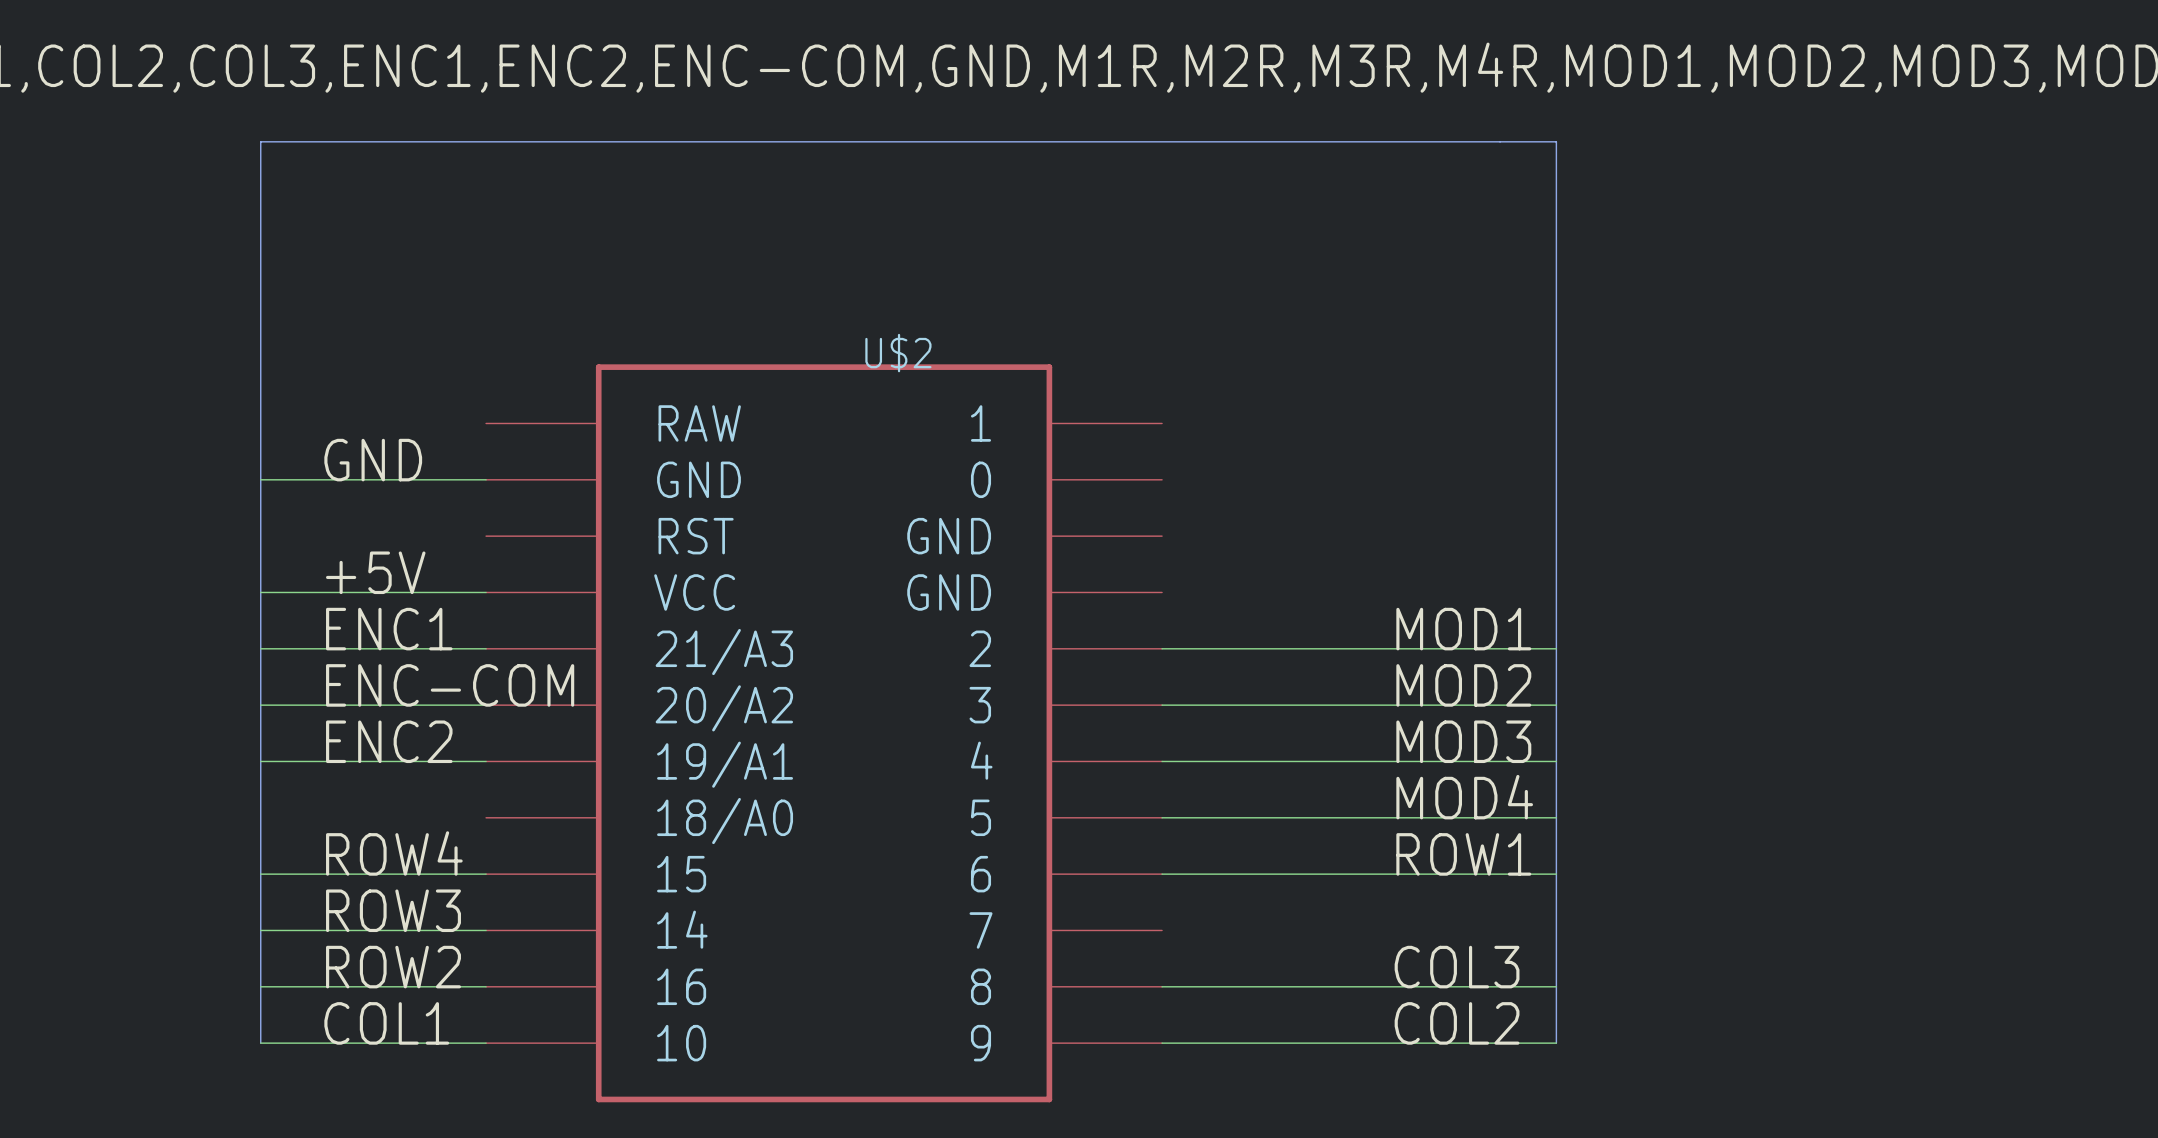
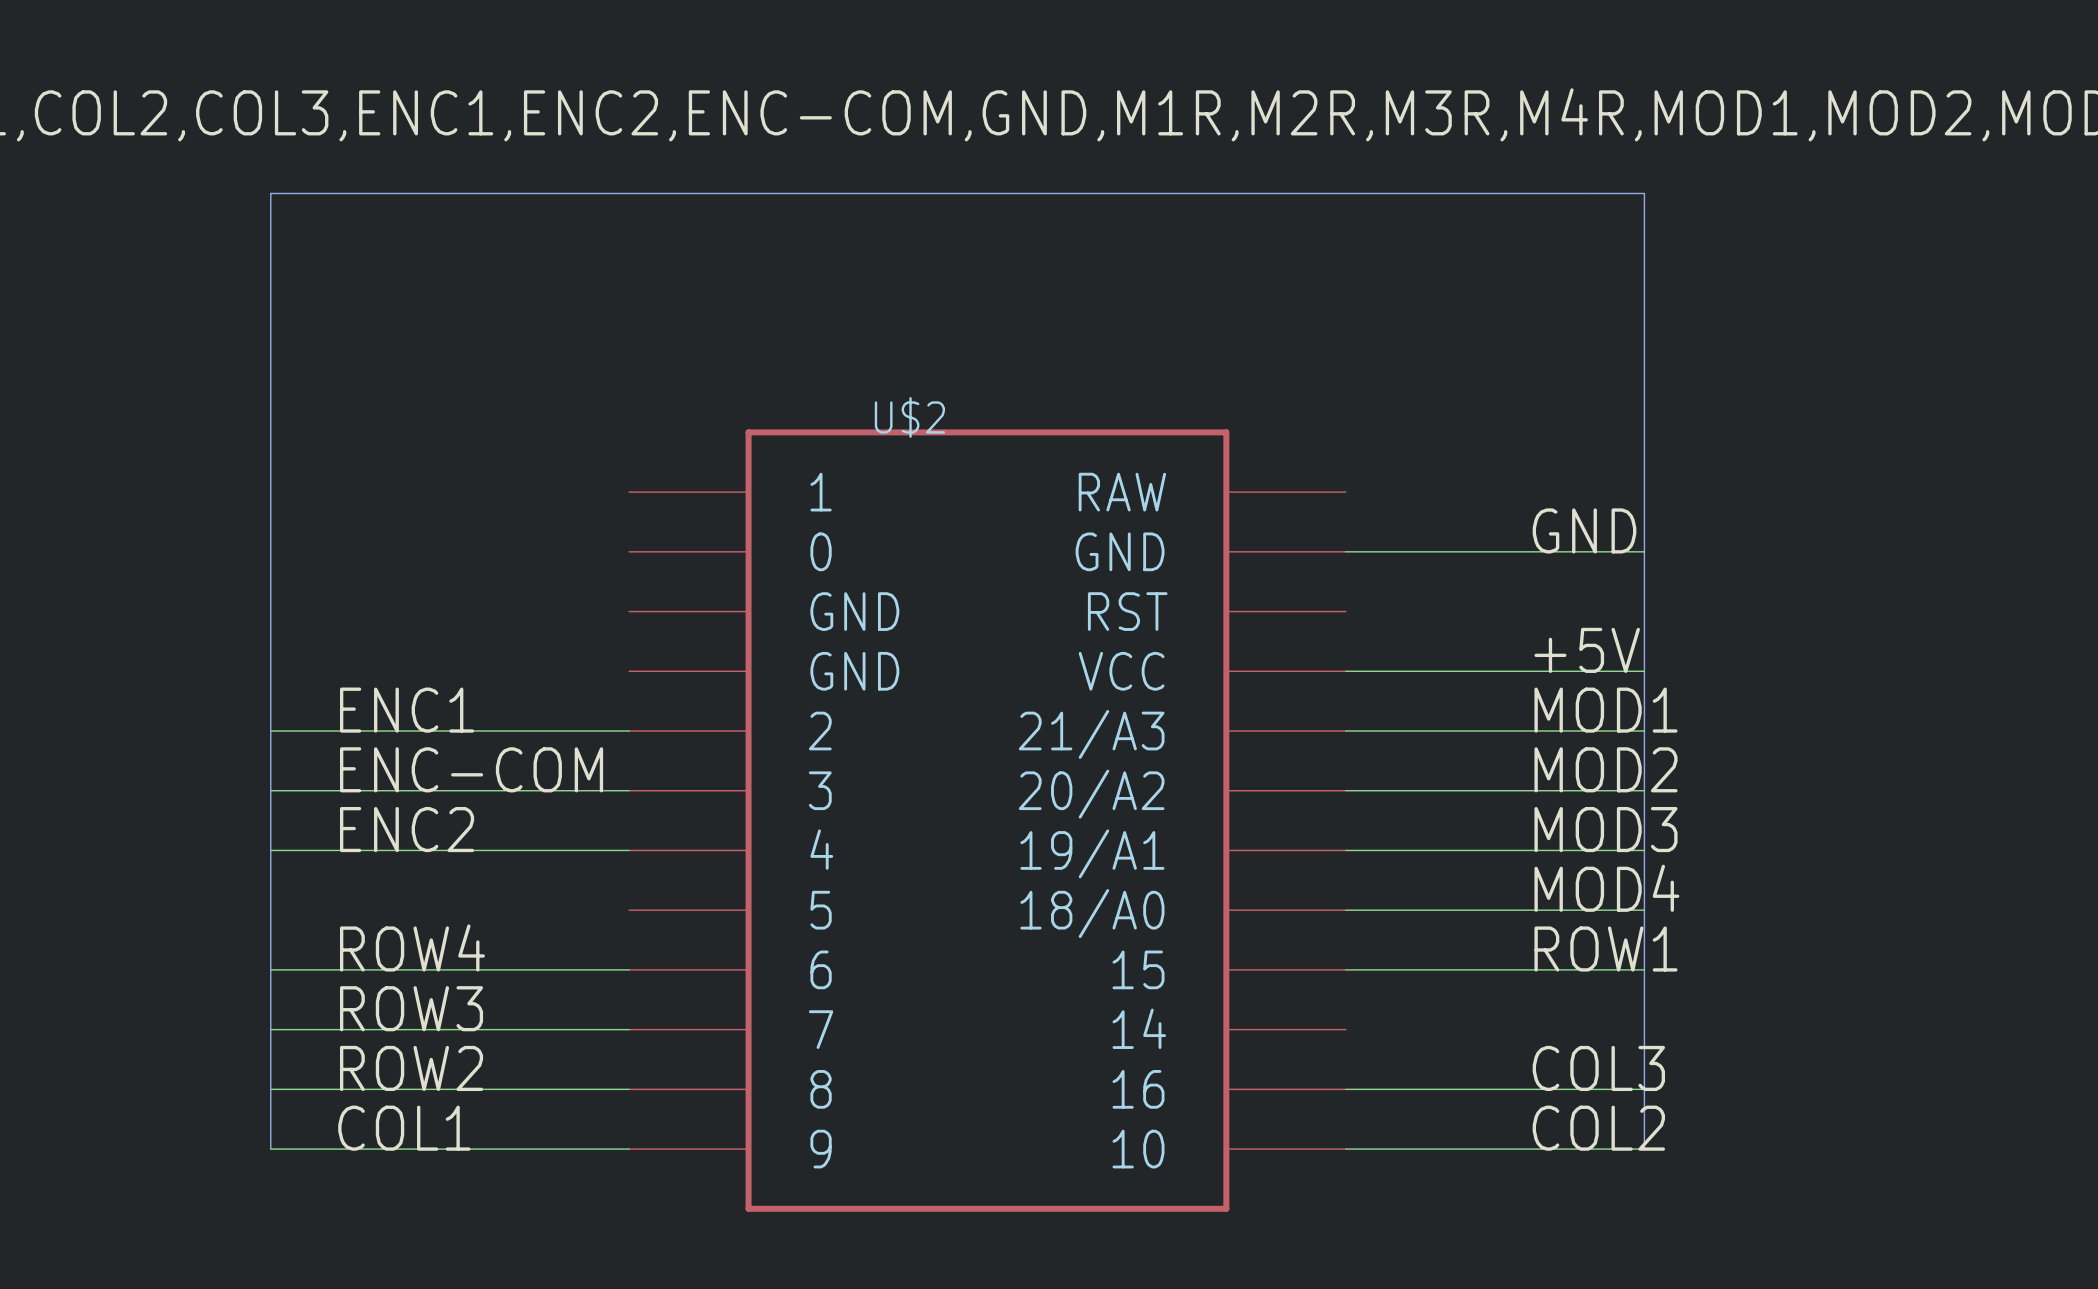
label: GND (373, 460) -> none
label: none -> GND (1584, 530)
wire: (260, 479) (486, 479) -> none
wire: none -> (1345, 551) (1644, 551)
label: +5V (375, 572) -> none
label: none -> +5V (1587, 650)
wire: (260, 592) (486, 592) -> none
wire: none -> (1345, 671) (1644, 671)
label position: MOD1 (1463, 629) -> MOD1 (1606, 710)
label position: MOD2 (1463, 685) -> MOD2 (1606, 769)
U$2 flip: as is (824, 733) -> left-right (987, 820)
label position: MOD3 (1463, 741) -> MOD3 (1606, 829)
label position: MOD4 (1464, 797) -> MOD4 (1606, 888)
label position: ROW1 (1463, 854) -> ROW1 (1606, 949)
label position: COL3 (1457, 967) -> COL3 (1598, 1068)
label position: COL2 (1457, 1023) -> COL2 (1598, 1128)

